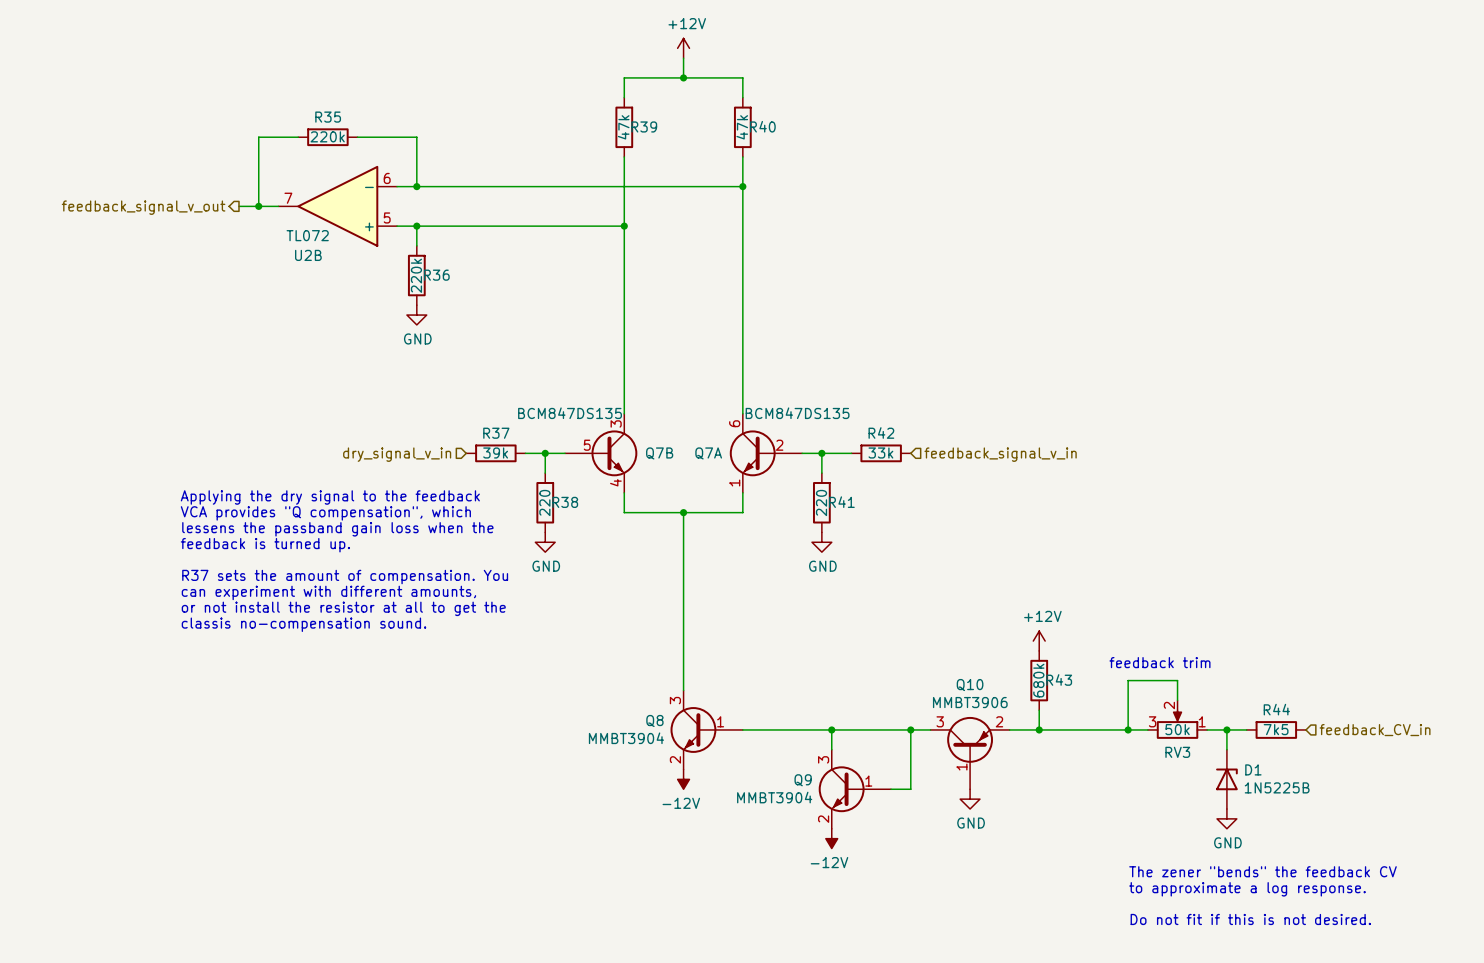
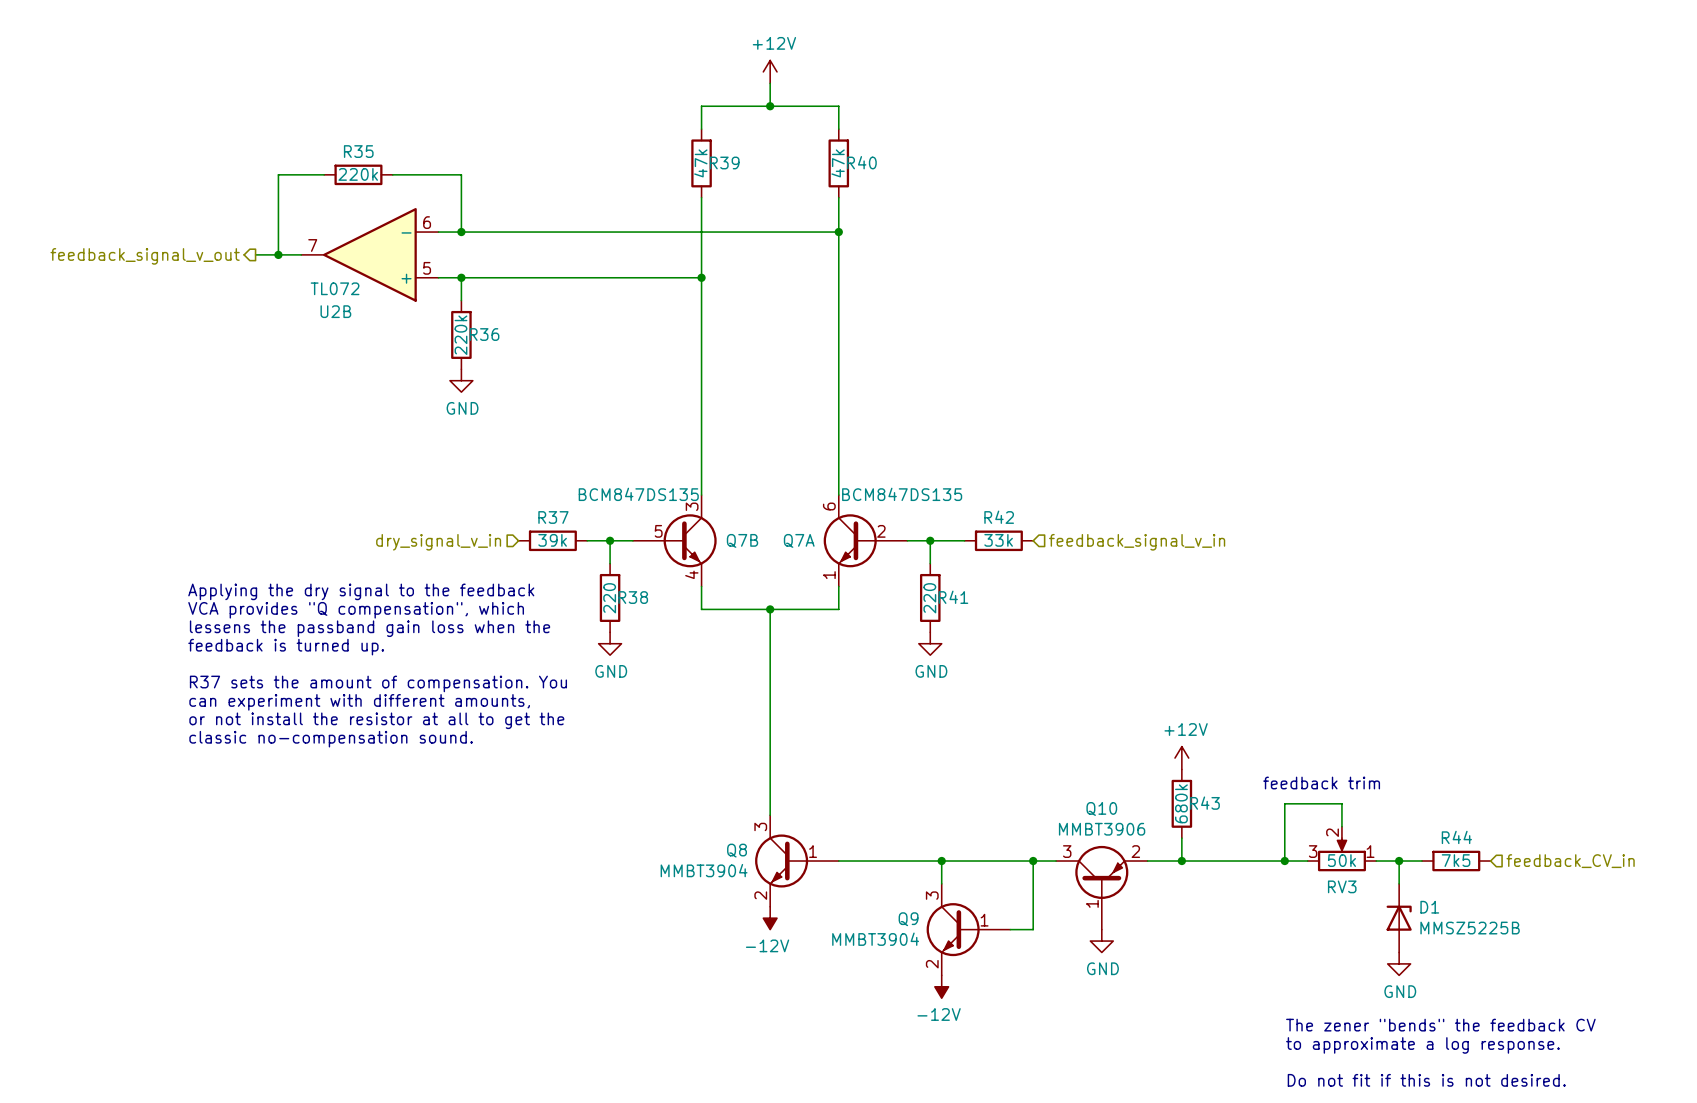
text: classis no-compensation sound. (303, 624) -> classic no-compensation sound. (331, 739)
D1 value: 1N5225B (1277, 787) -> MMSZ5225B (1470, 928)

